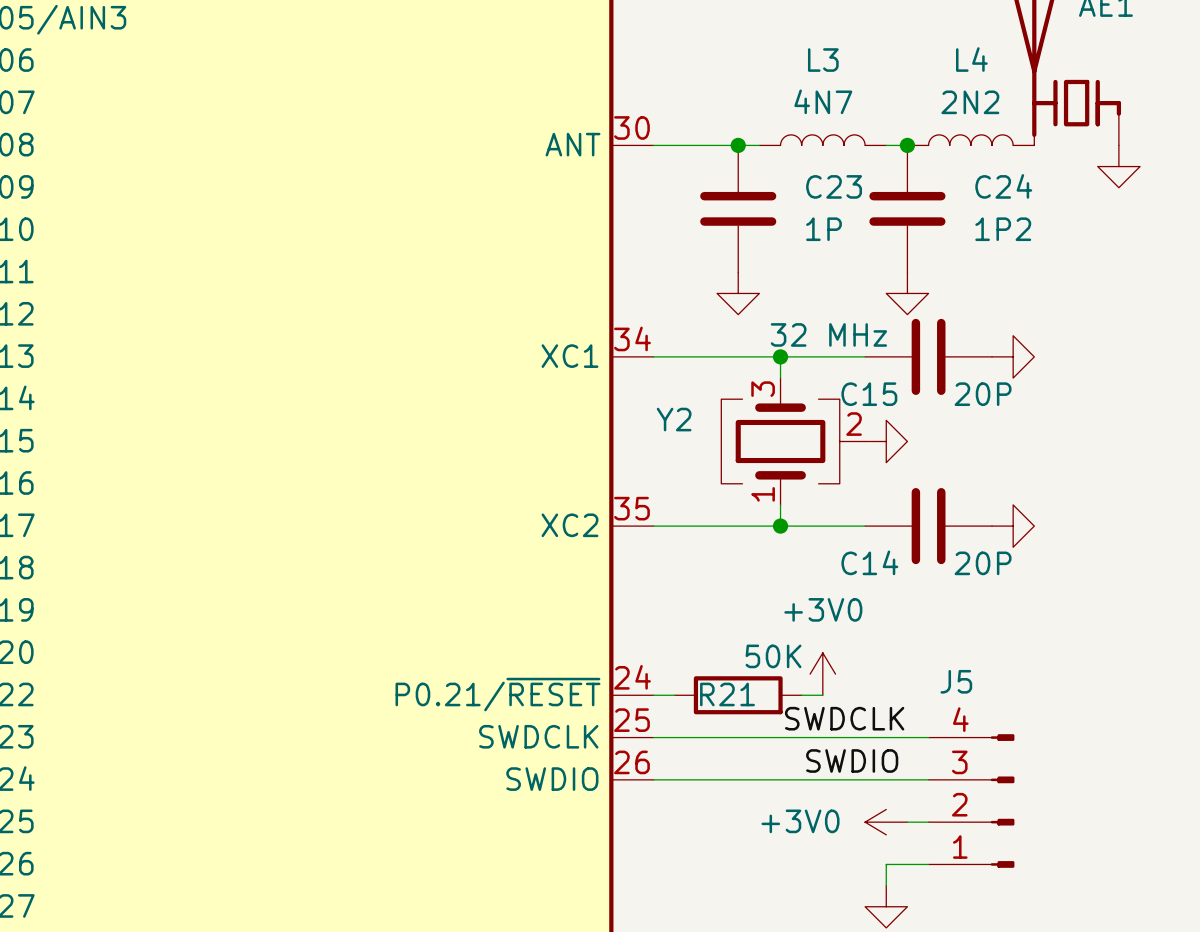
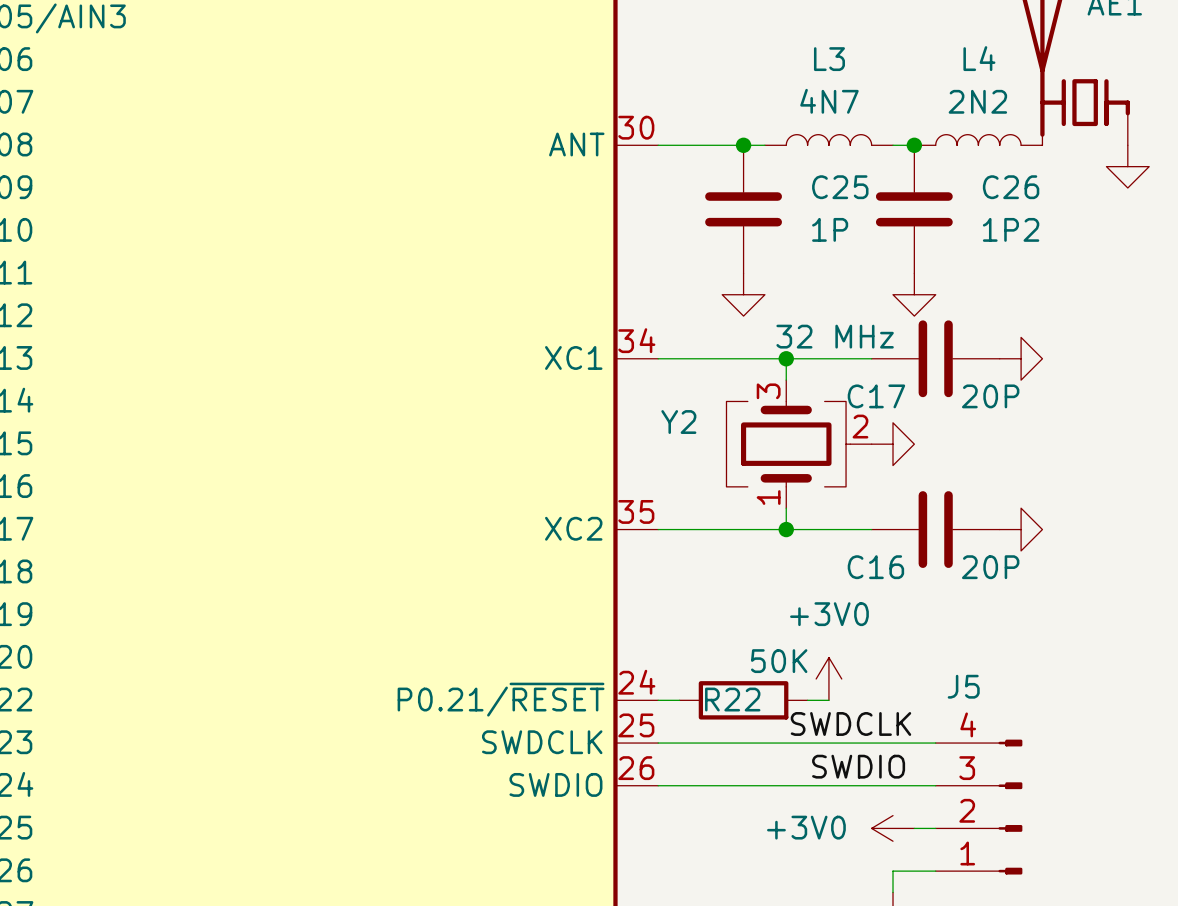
C23 name: C23 (834, 186) -> C25 (840, 187)
C24 name: C24 (1003, 186) -> C26 (1011, 187)
C15 name: C15 (869, 394) -> C17 (876, 396)
C14 name: C14 (869, 562) -> C16 (875, 567)
R21 name: R21 (727, 694) -> R22 (732, 699)

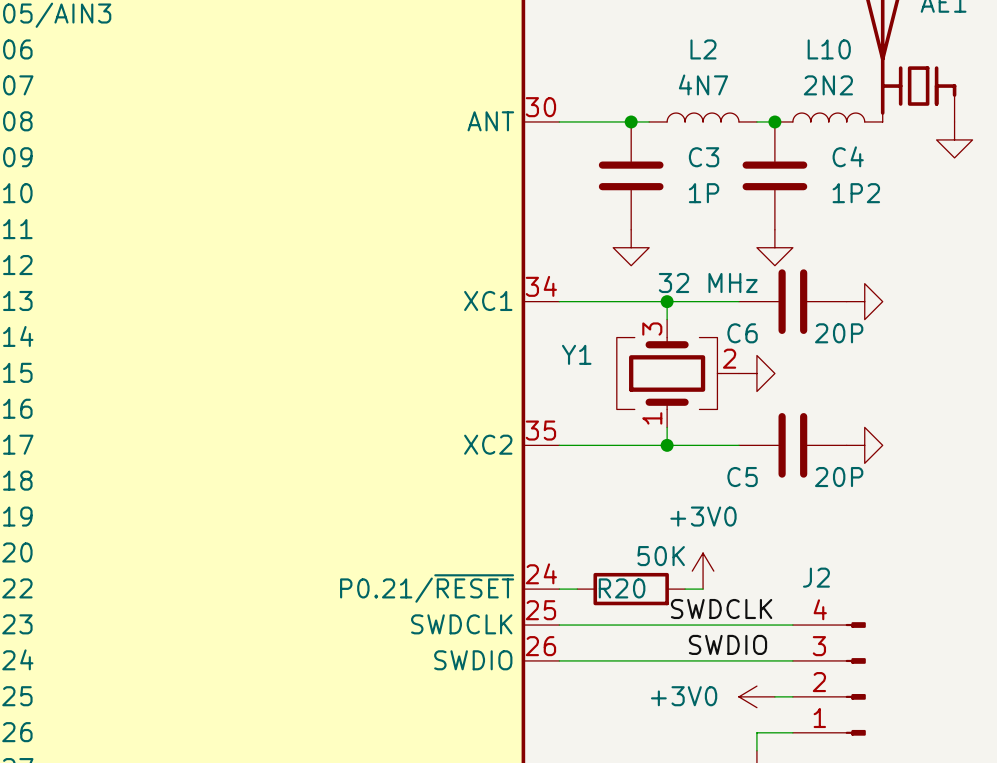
L4 name: L4 (979, 58) -> L10 (829, 49)
L3 name: L3 (829, 59) -> L2 (703, 49)
C25 name: C25 (840, 187) -> C3 (704, 157)
C26 name: C26 (1011, 187) -> C4 (848, 156)
C17 name: C17 (876, 396) -> C6 (742, 333)
Y2 name: Y2 (678, 422) -> Y1 (576, 354)
C16 name: C16 (875, 567) -> C5 (742, 477)
J5 name: J5 (963, 686) -> J2 (816, 577)
R22 name: R22 (732, 699) -> R20 (622, 588)

